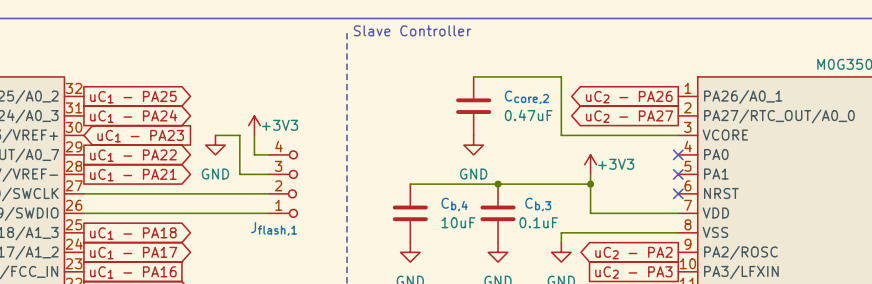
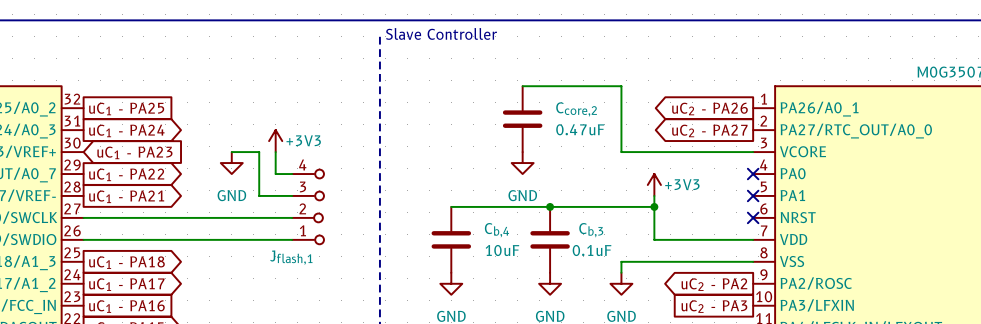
global label shape: output (133, 97) -> passive (126, 108)

